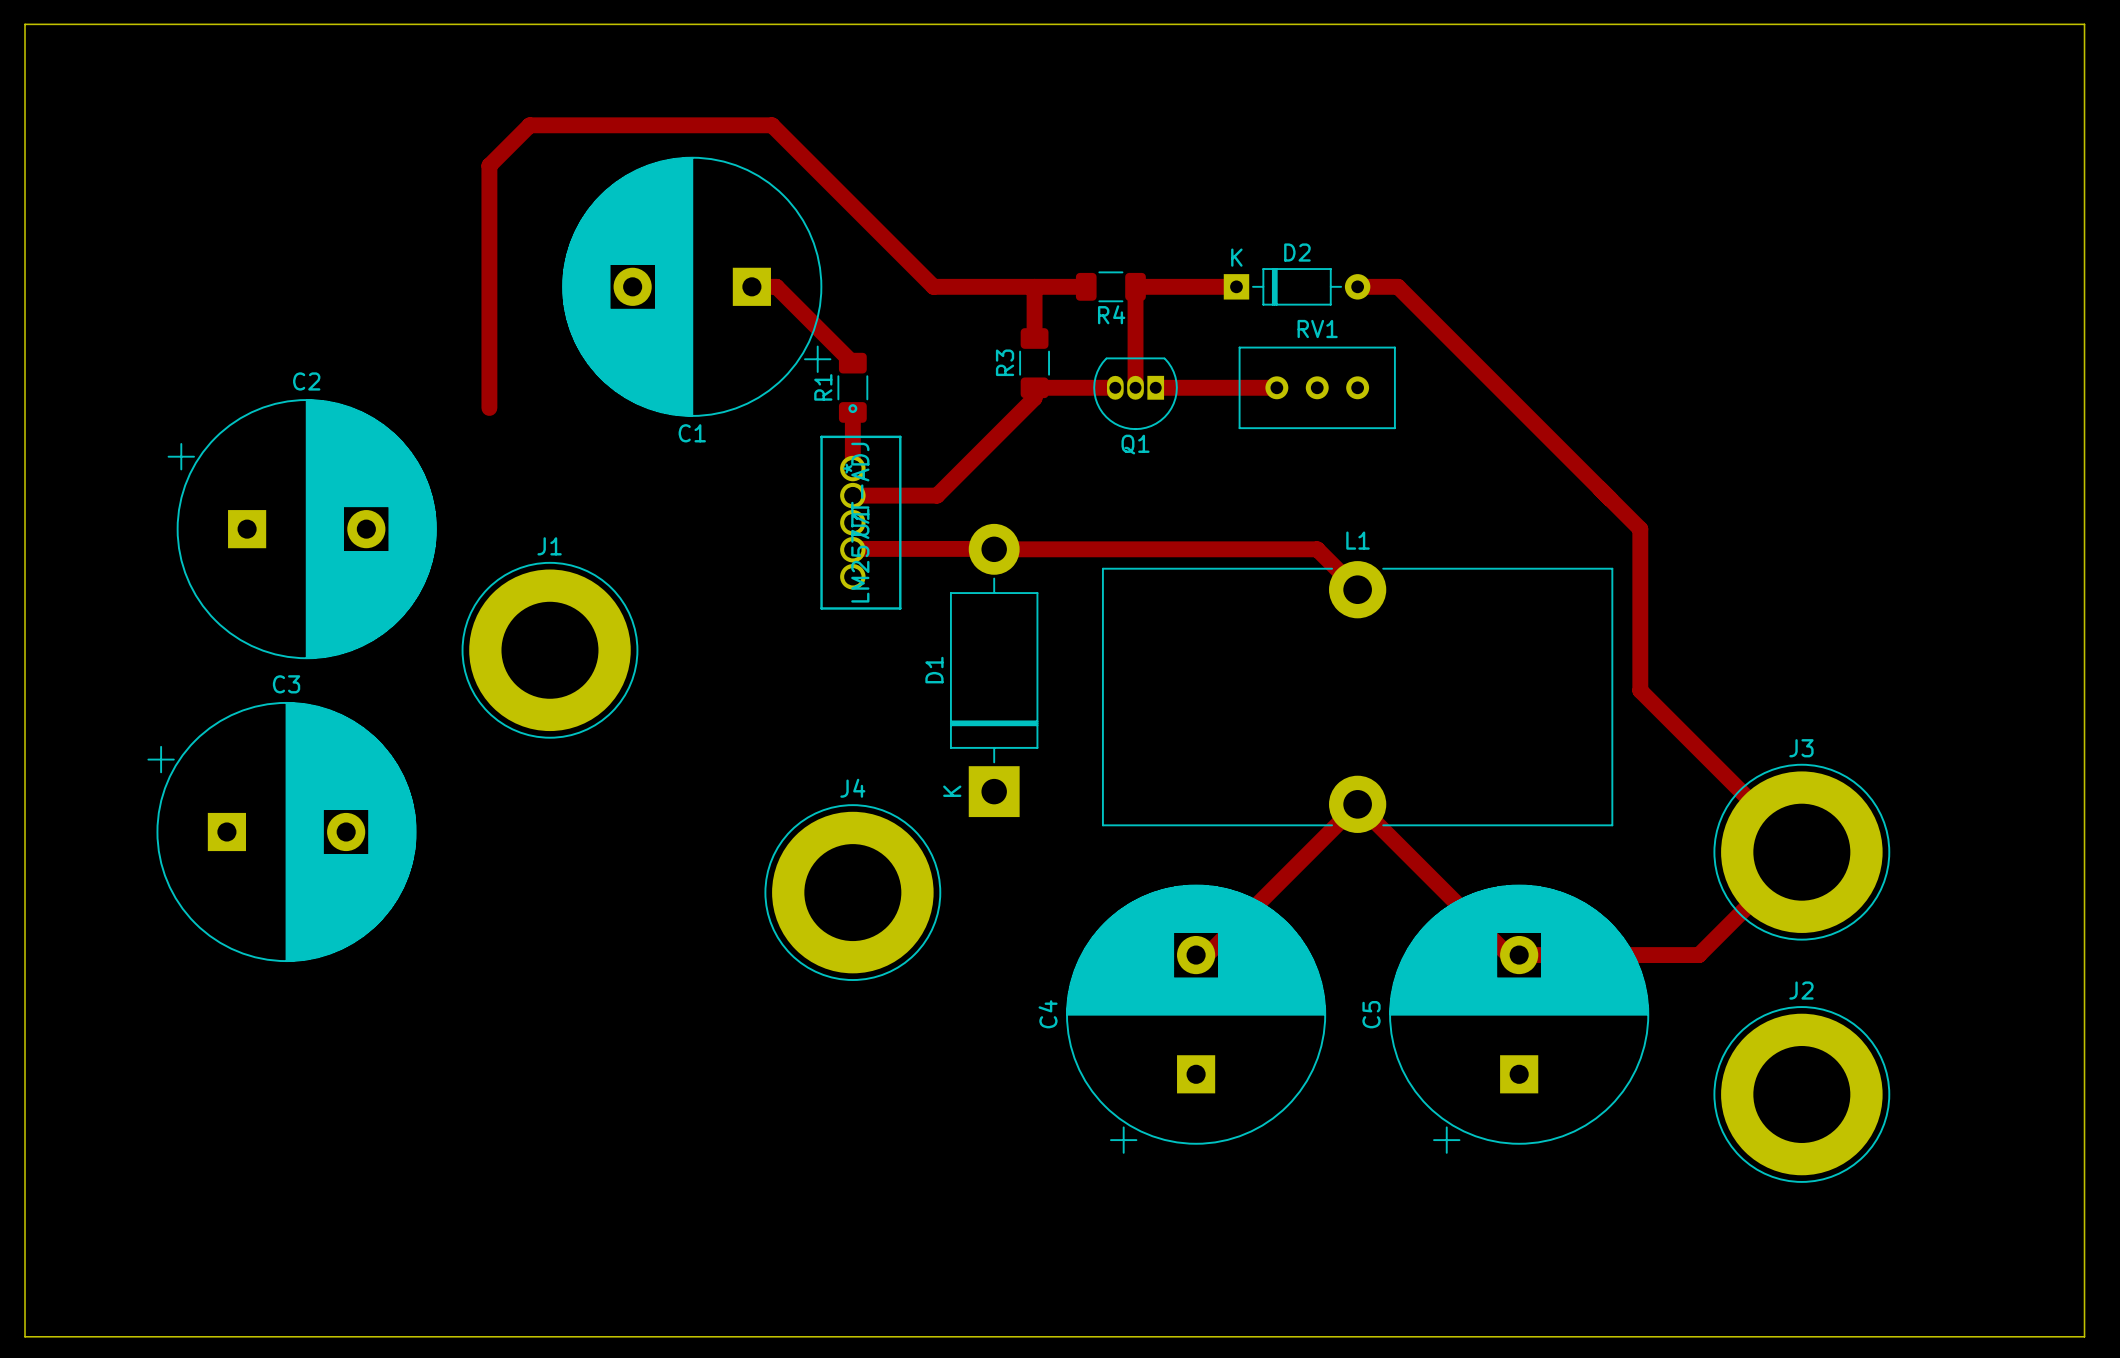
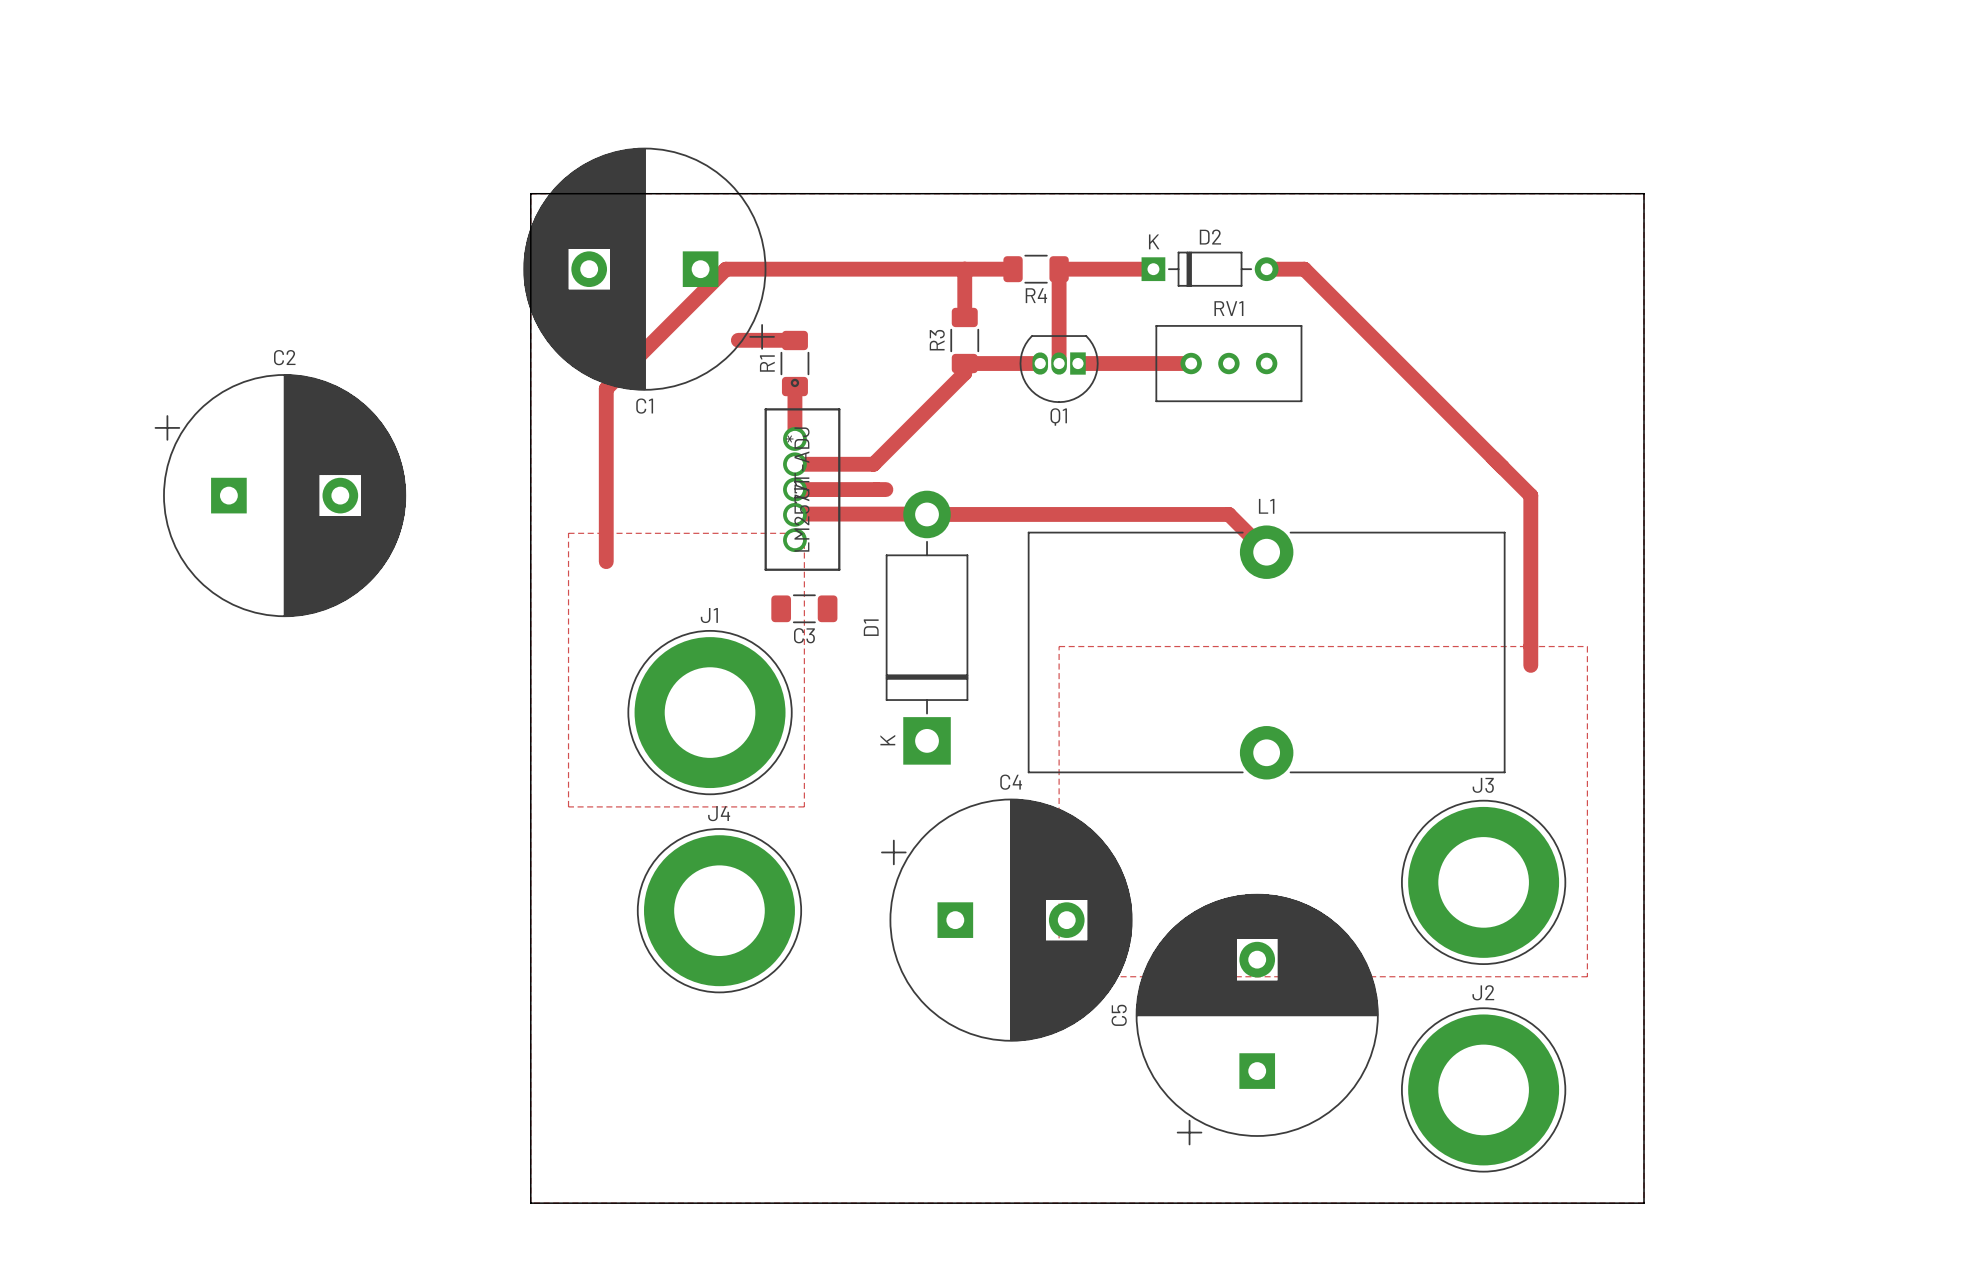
board edge: (25, 24) (2084, 24) (2084, 1336) (25, 1336) (25, 24) -> none
board edge: none -> (530, 193) (1644, 193) (1644, 1203) (530, 1203) (530, 193)
track: (751, 286) (776, 286) (852, 362) -> (738, 340) (794, 340)
track: (933, 286) (772, 125) (529, 125) (489, 165) (489, 407) -> (870, 269) (725, 269) (606, 388) (606, 561)
track: none -> (794, 489) (885, 489)
zone outline: none -> (568, 533) (568, 806) (804, 806) (804, 533) (568, 533)
J1 position: (549, 650) -> (710, 712)
C3 name position: C3 (286, 684) -> C3 (804, 635)
zone outline: none -> (1059, 646) (1059, 976) (1587, 976) (1587, 646) (1059, 646)
track: (1640, 690) (1801, 852) (1698, 955) (1508, 955) (1357, 804) (1206, 955) (1196, 955) -> (1530, 646) (1530, 665)
C3 footprint: [147, 701, 417, 963] -> [771, 594, 838, 624]
J3 position: (1801, 852) -> (1483, 882)
J4 position: (852, 892) -> (719, 910)
C4 rotation: 0° (1196, 1019) -> 90° clockwise (1006, 920)
C5 position: (1519, 1019) -> (1257, 1019)
J2 position: (1801, 1094) -> (1483, 1089)

